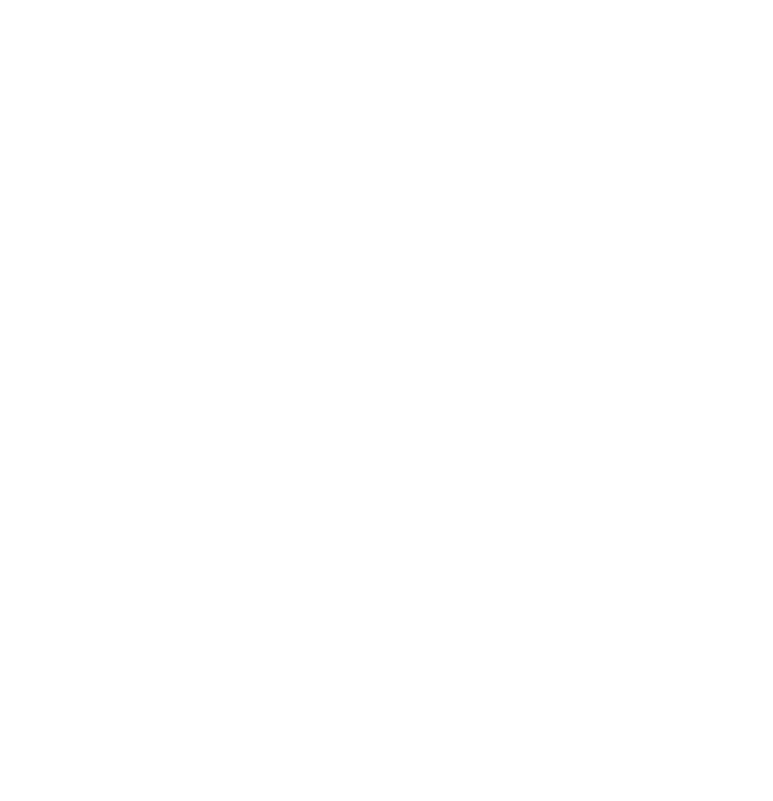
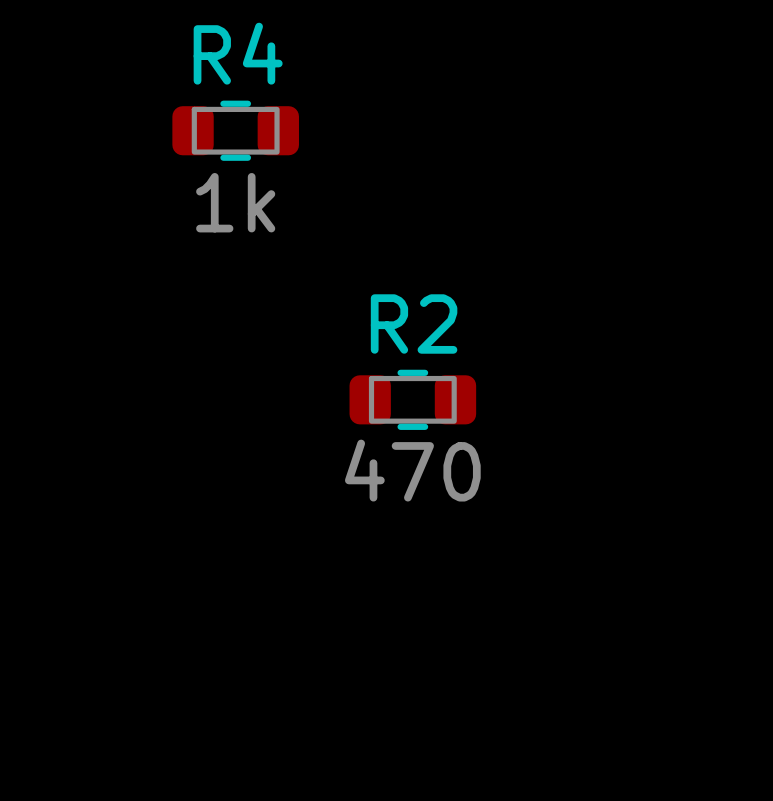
R4: none -> 1k (235, 130)
R2: none -> 470 (412, 399)

